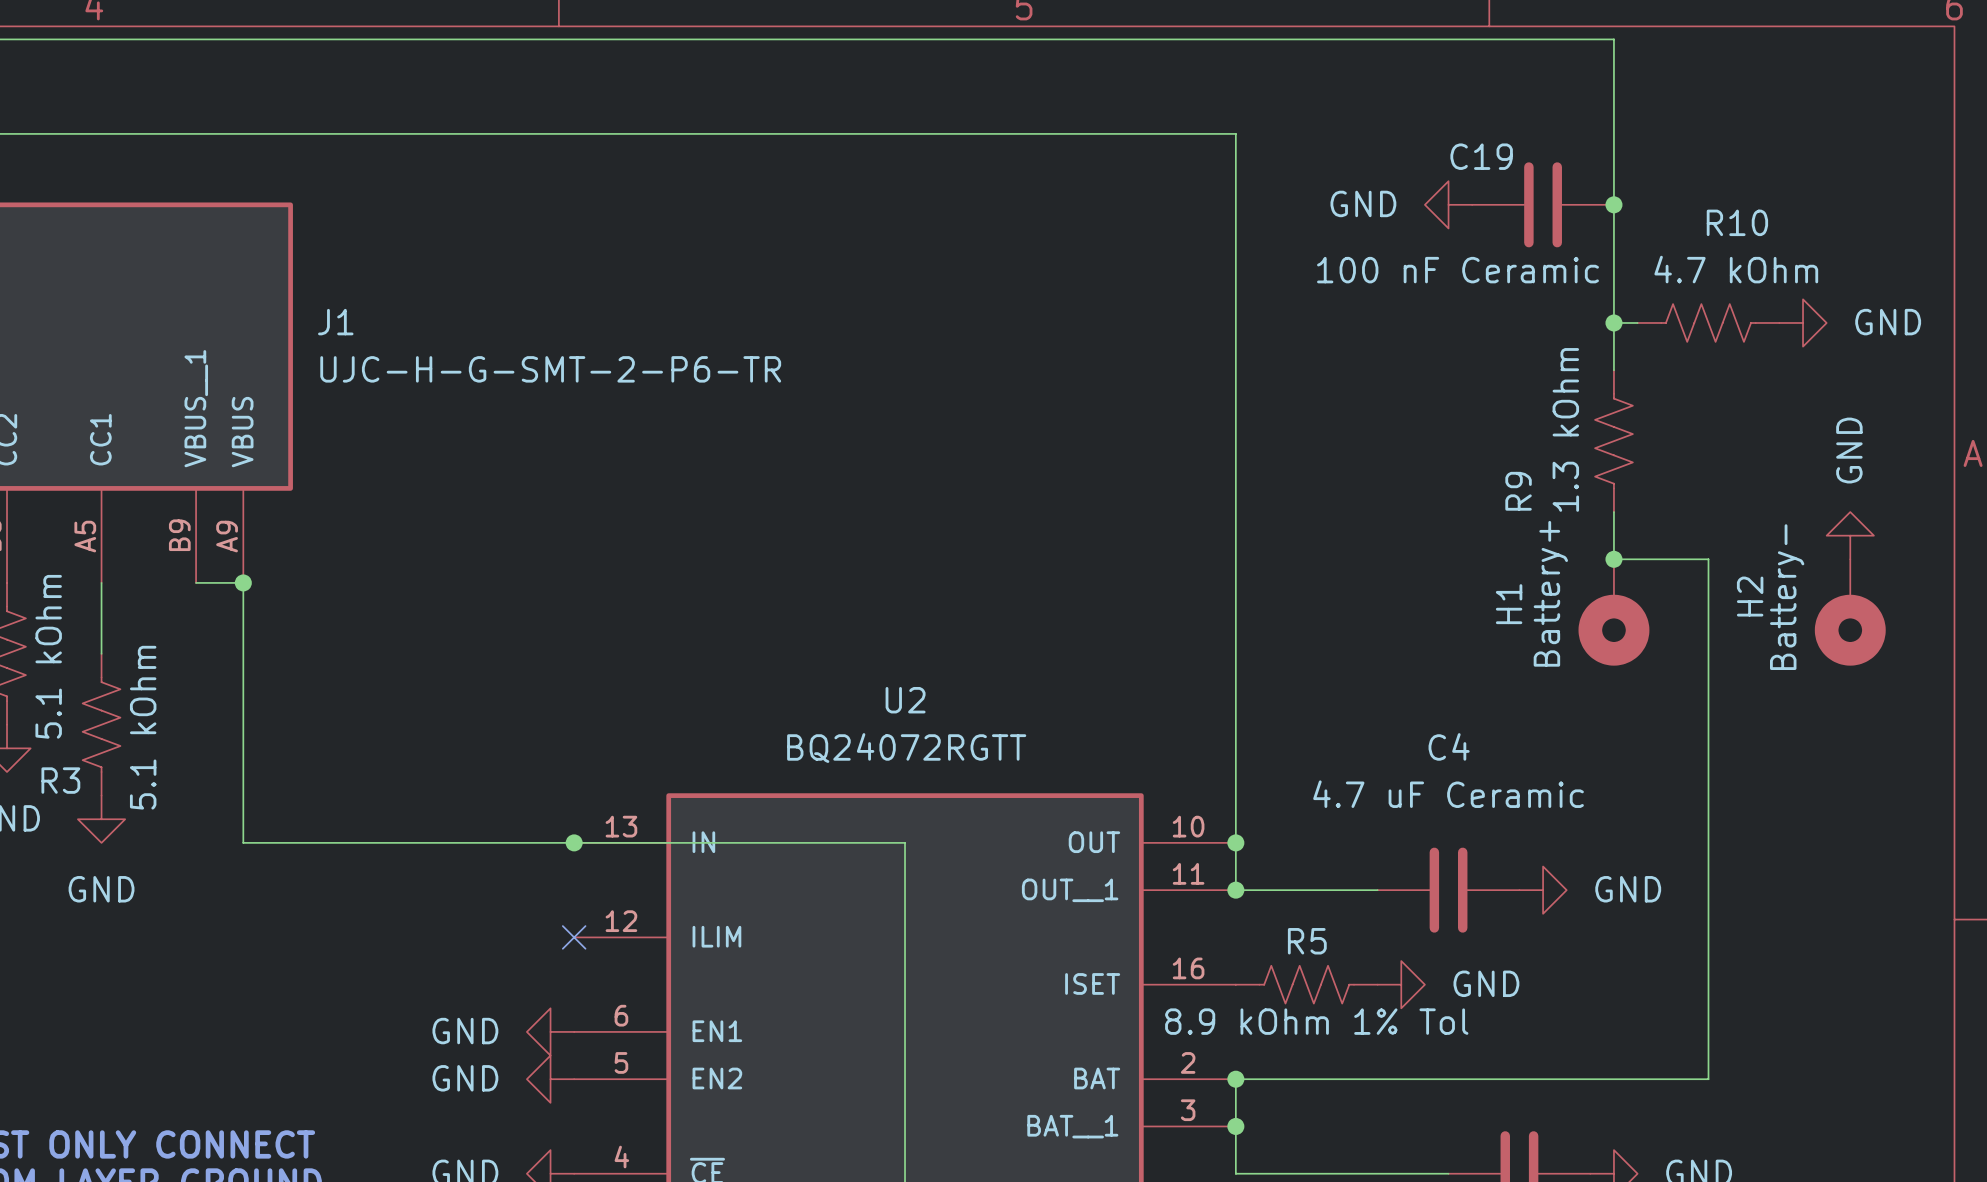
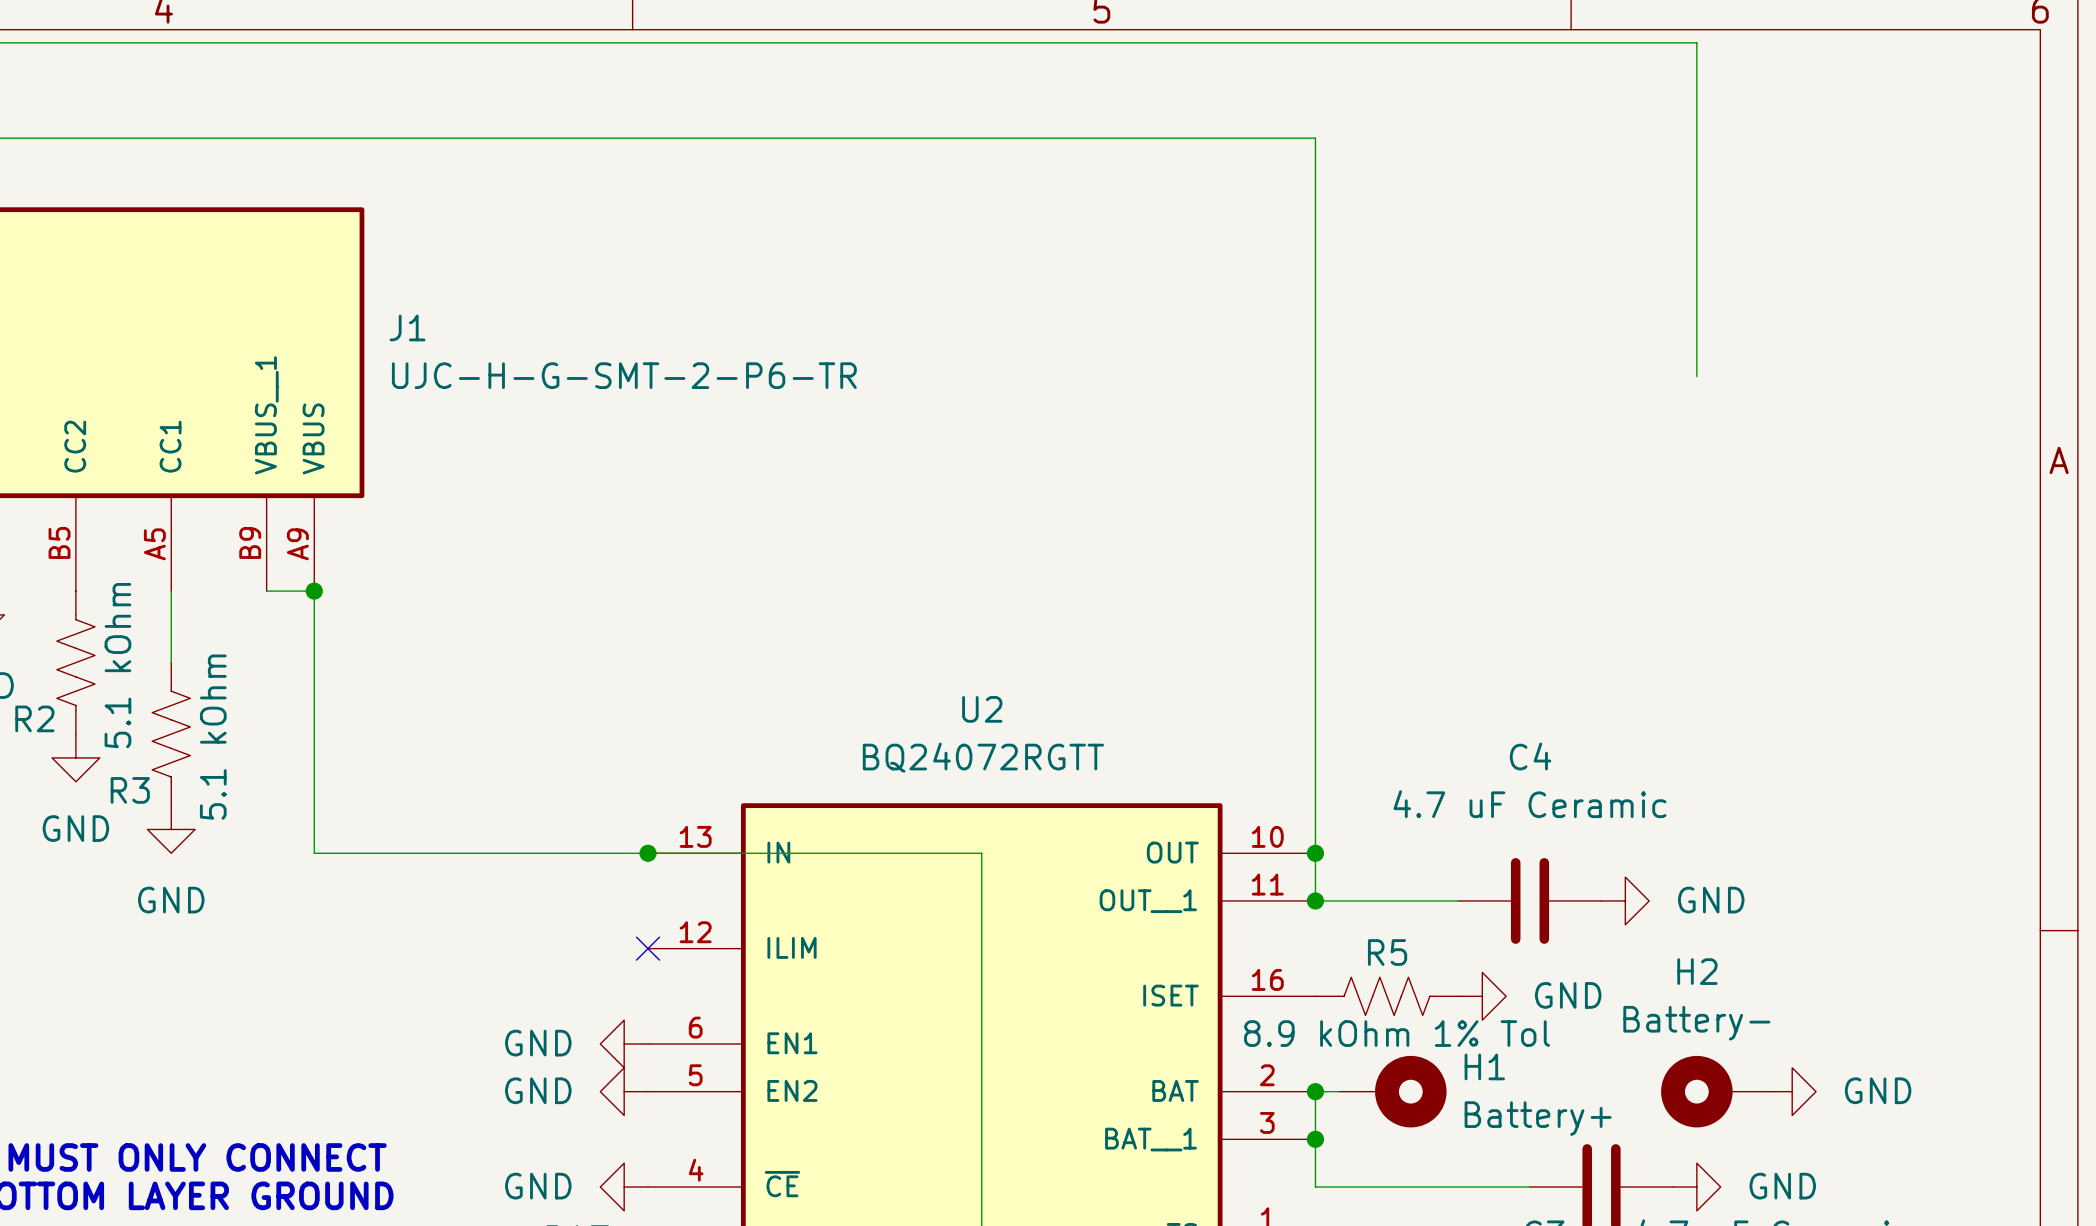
power symbol: GND (1448, 204) -> none
C19: 100 nF Ceramic (1543, 204) -> none
junction: (1613, 204) -> none
wire: (1613, 322) (1637, 322) -> none
junction: (1613, 322) -> none
R10: 4.7 kOhm (1708, 322) -> none
power symbol: GND (1803, 322) -> none
R9: 1.3 kOhm (1613, 441) -> none
wire: (1613, 512) (1613, 559) (1708, 559) (1708, 1079) (1259, 1079) -> none
power symbol: GND (1850, 535) -> none
junction: (1613, 559) -> none
H1 value position: Battery+ (1550, 593) -> Battery+ (1538, 1118)
H2 name position: H2 (1750, 596) -> H2 (1697, 971)
H1 name position: H1 (1509, 604) -> H1 (1484, 1066)
H1 position: (1613, 612) -> (1392, 1091)
H2 position: (1850, 612) -> (1714, 1091)
H1 rotation: 0° (1613, 630) -> 90° counterclockwise (1410, 1091)
H2 rotation: 0° (1850, 630) -> 90° clockwise (1696, 1091)
power symbol: none -> GND (1792, 1091)

